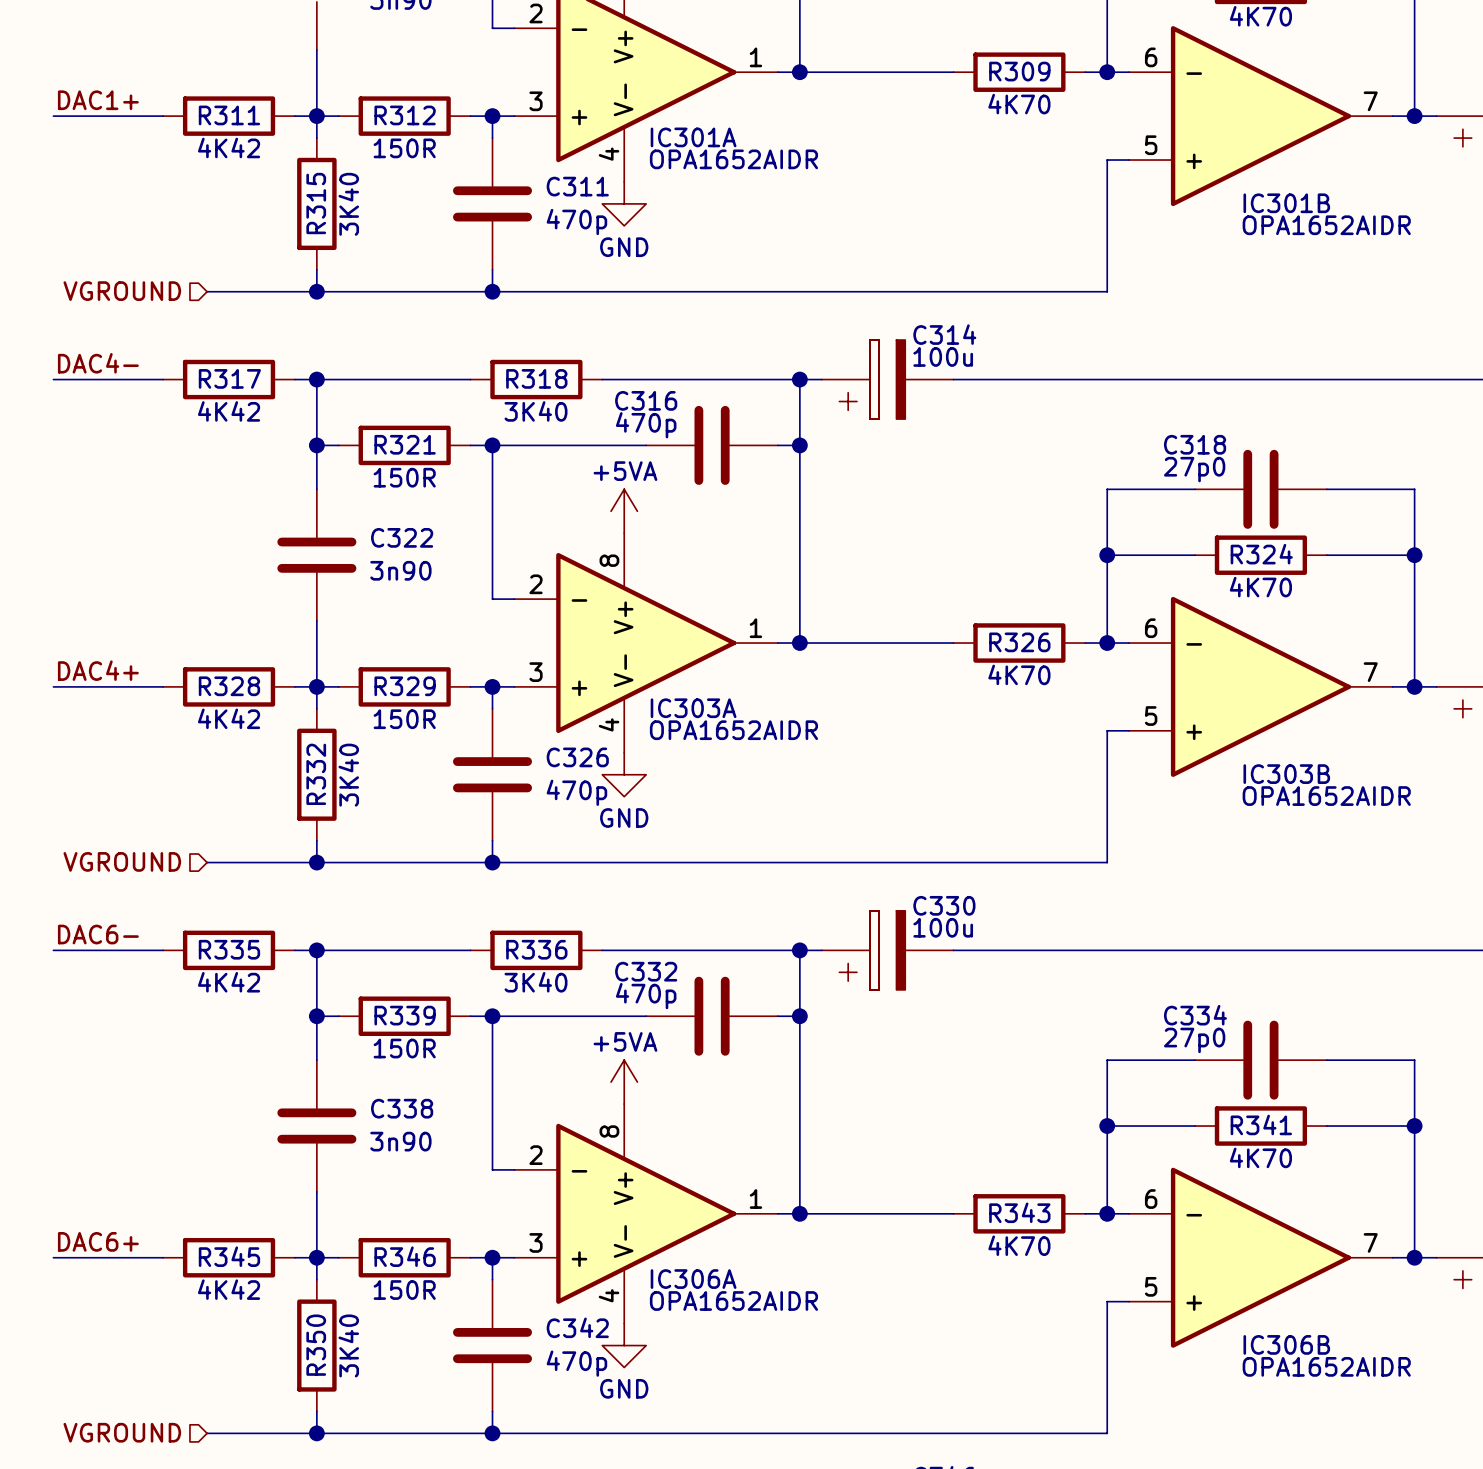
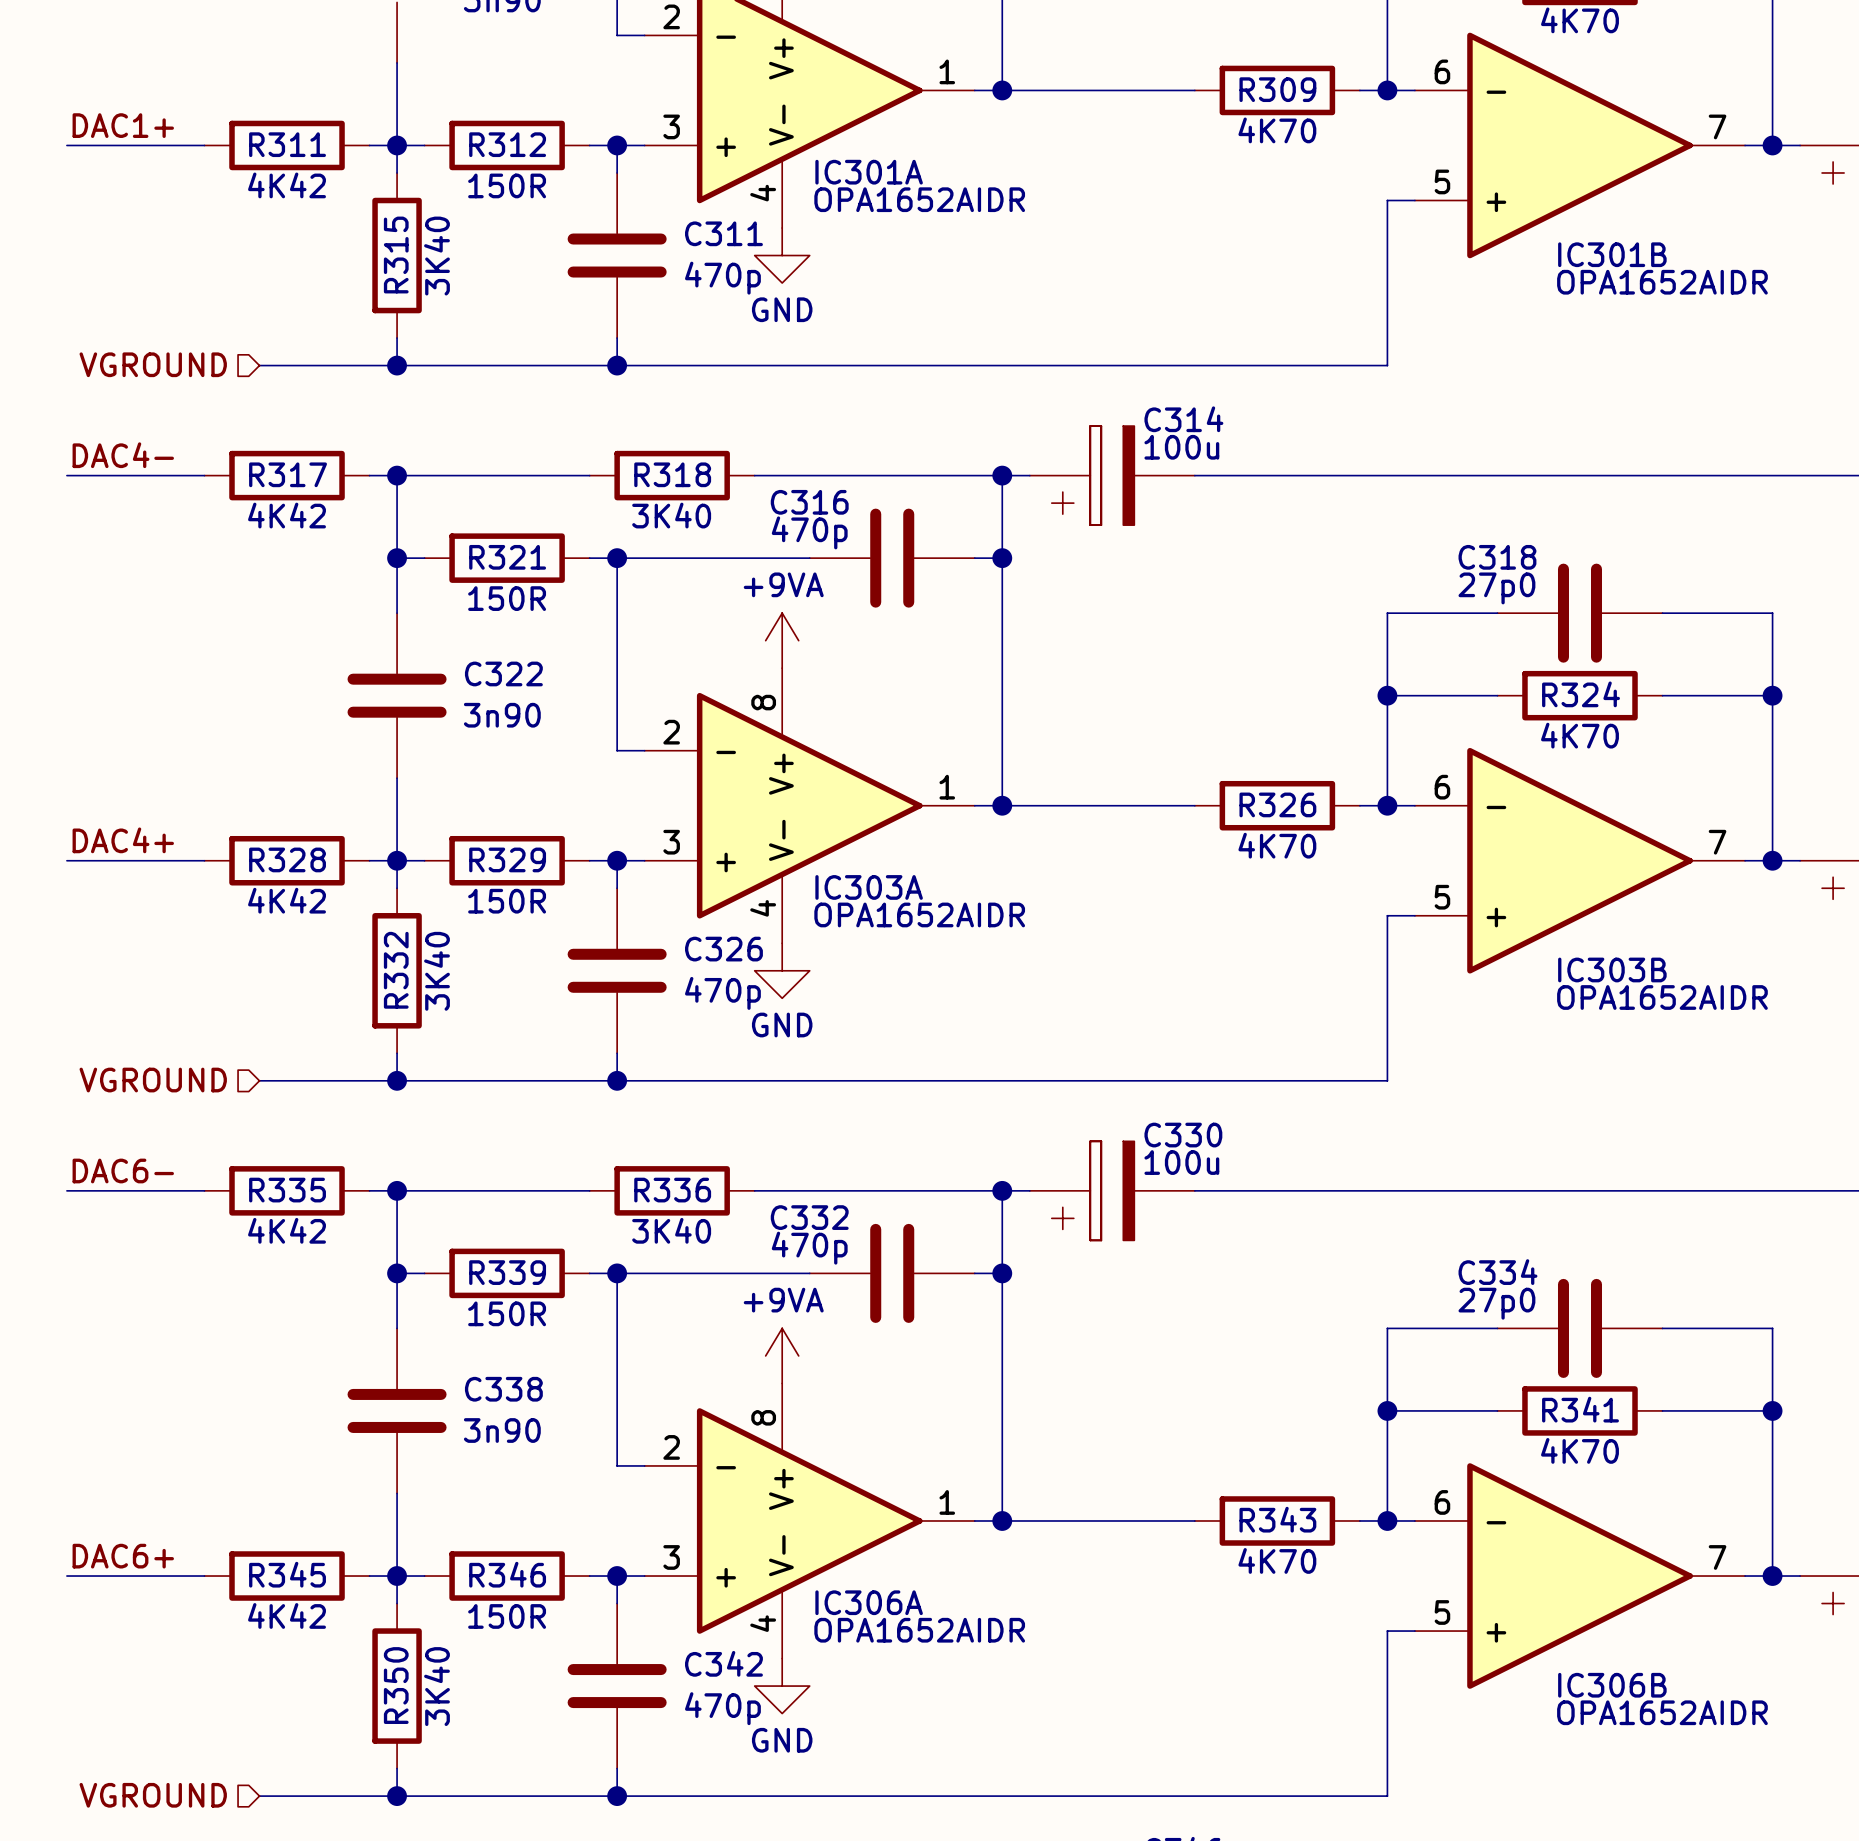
power symbol: +5VA (624, 511) -> +9VA (782, 640)
power symbol: +5VA (624, 1082) -> +9VA (782, 1355)

